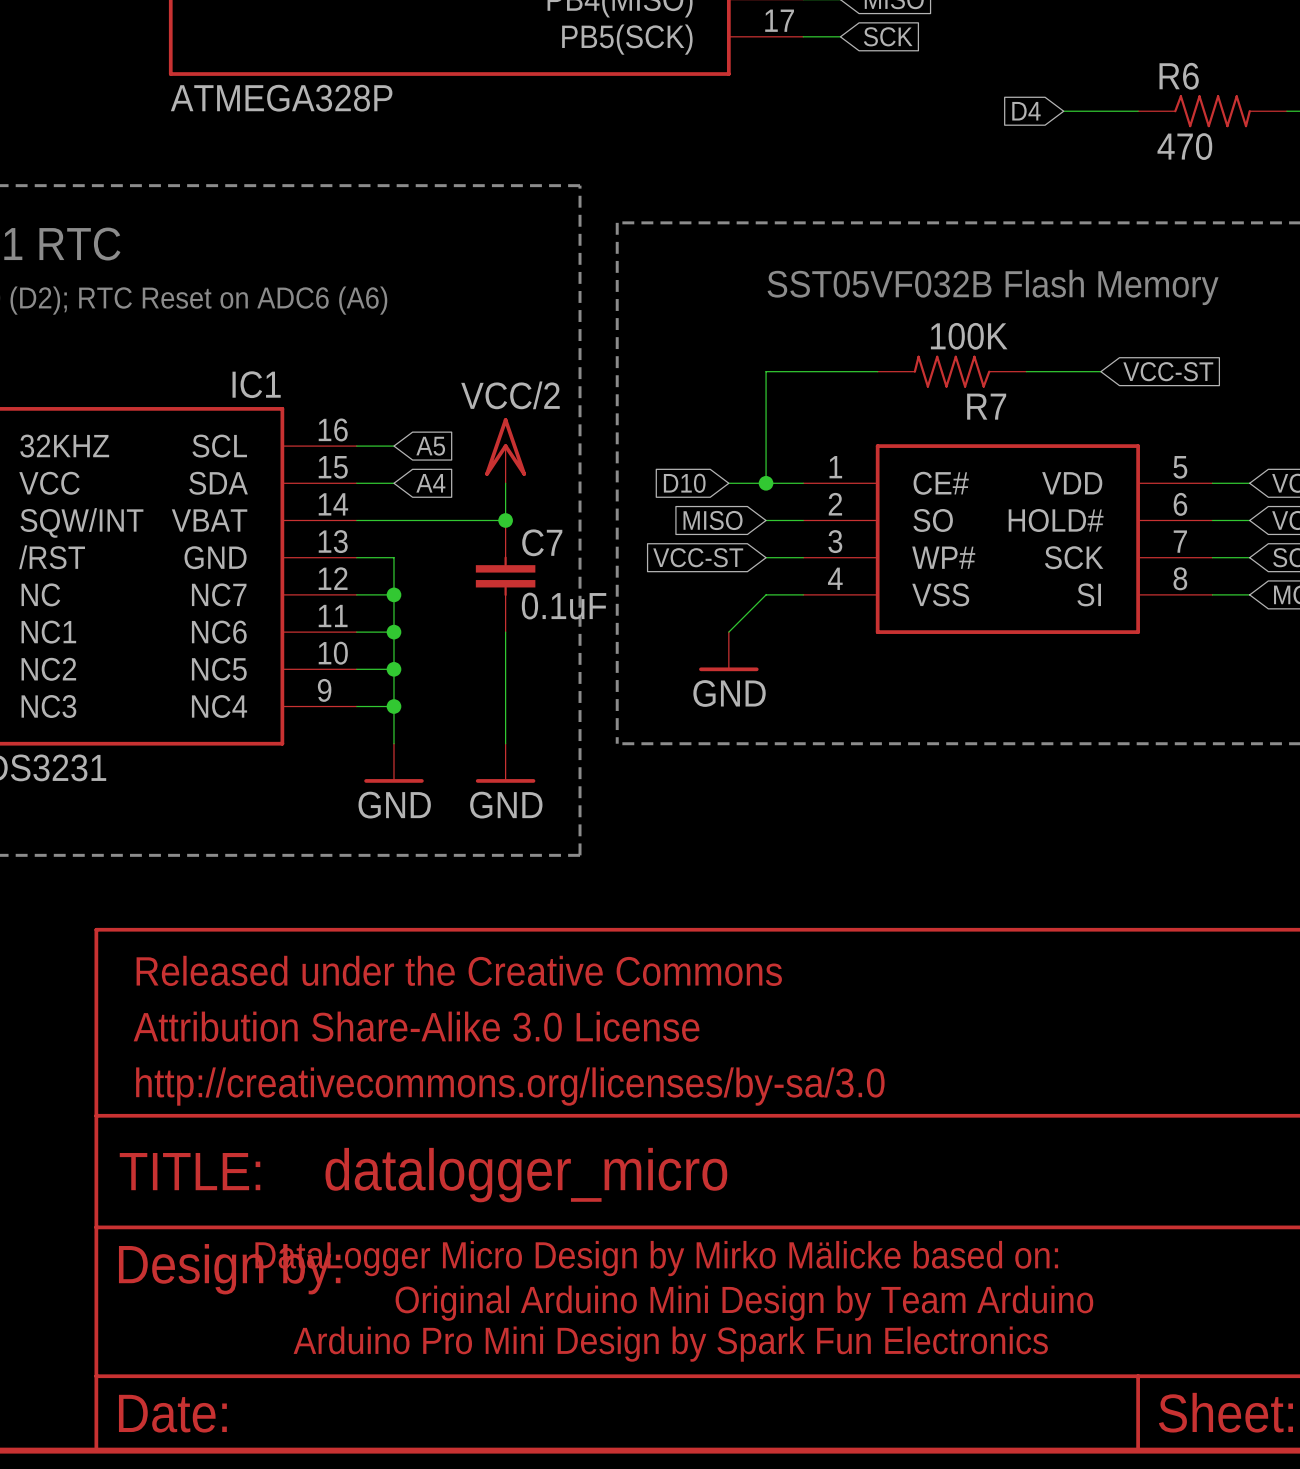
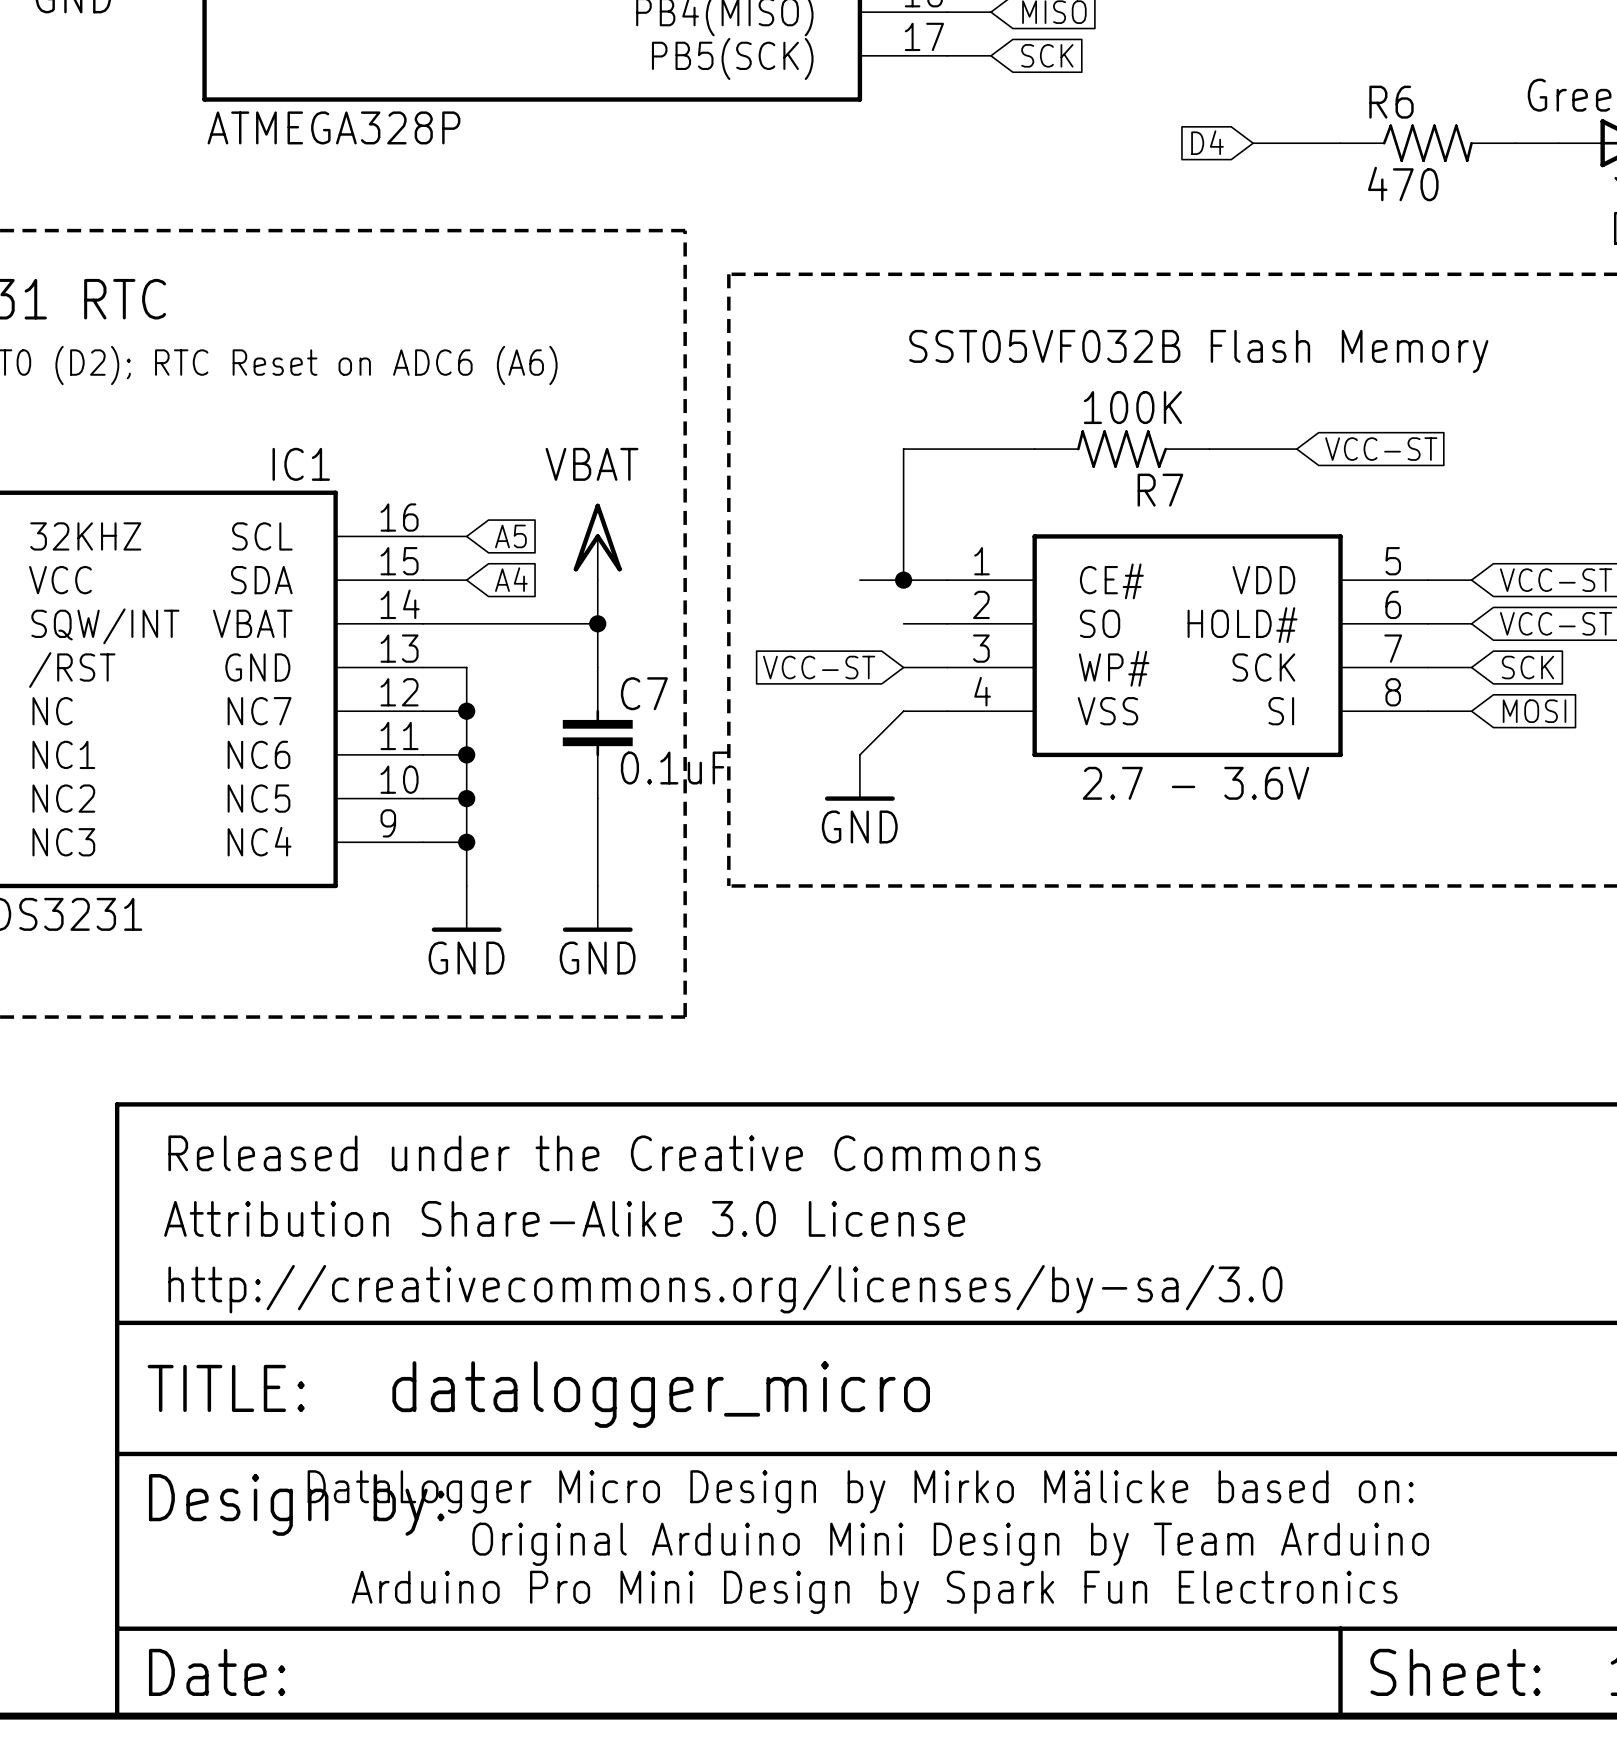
label: none -> VBAT (592, 464)
power symbol text: VCC/2 (510, 395) -> none
global label: D10 (684, 483) -> none
global label: MISO (713, 520) -> none
C7 position: (505, 576) -> (597, 733)
text: none -> 2.7 - 3.6V (1195, 783)

